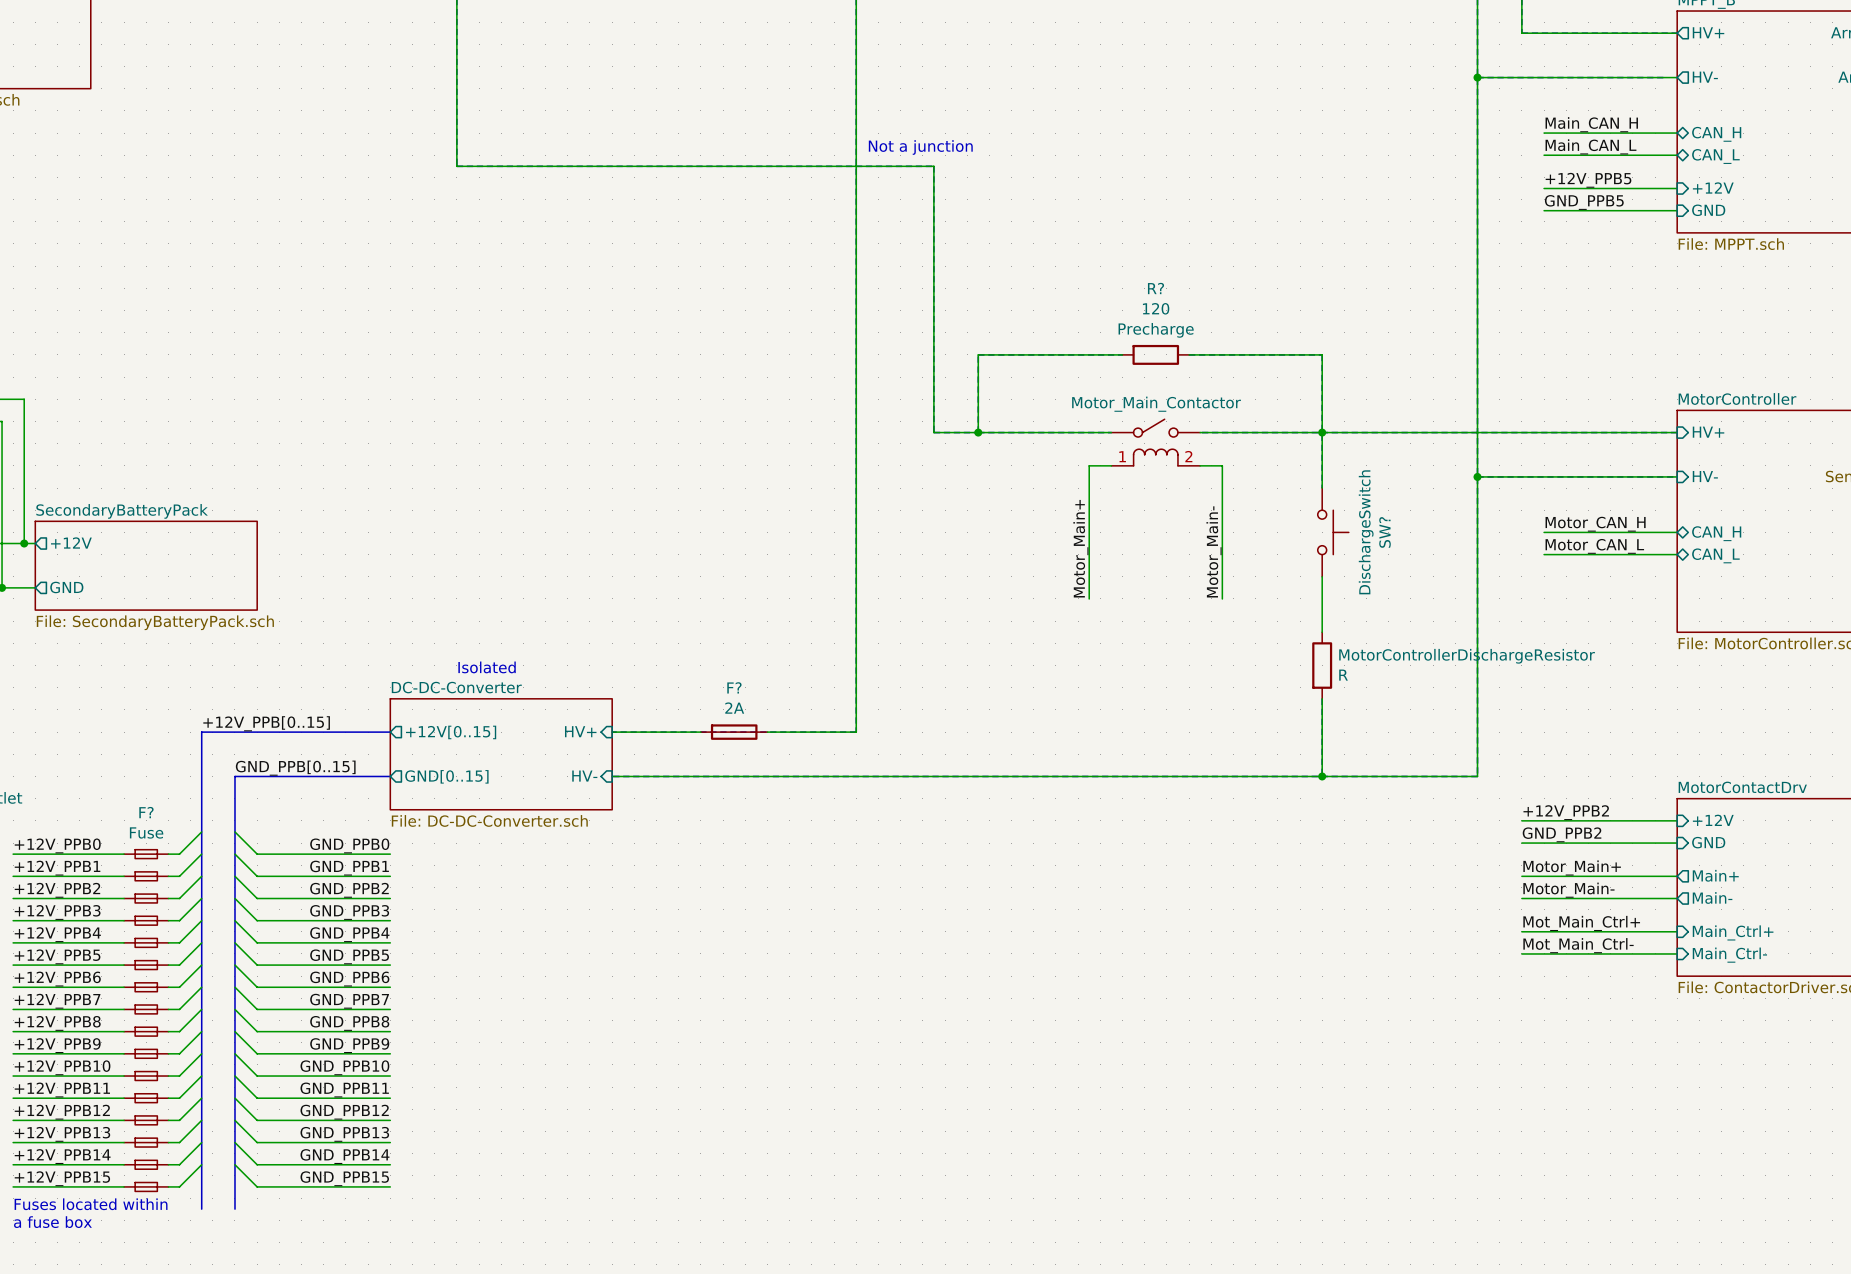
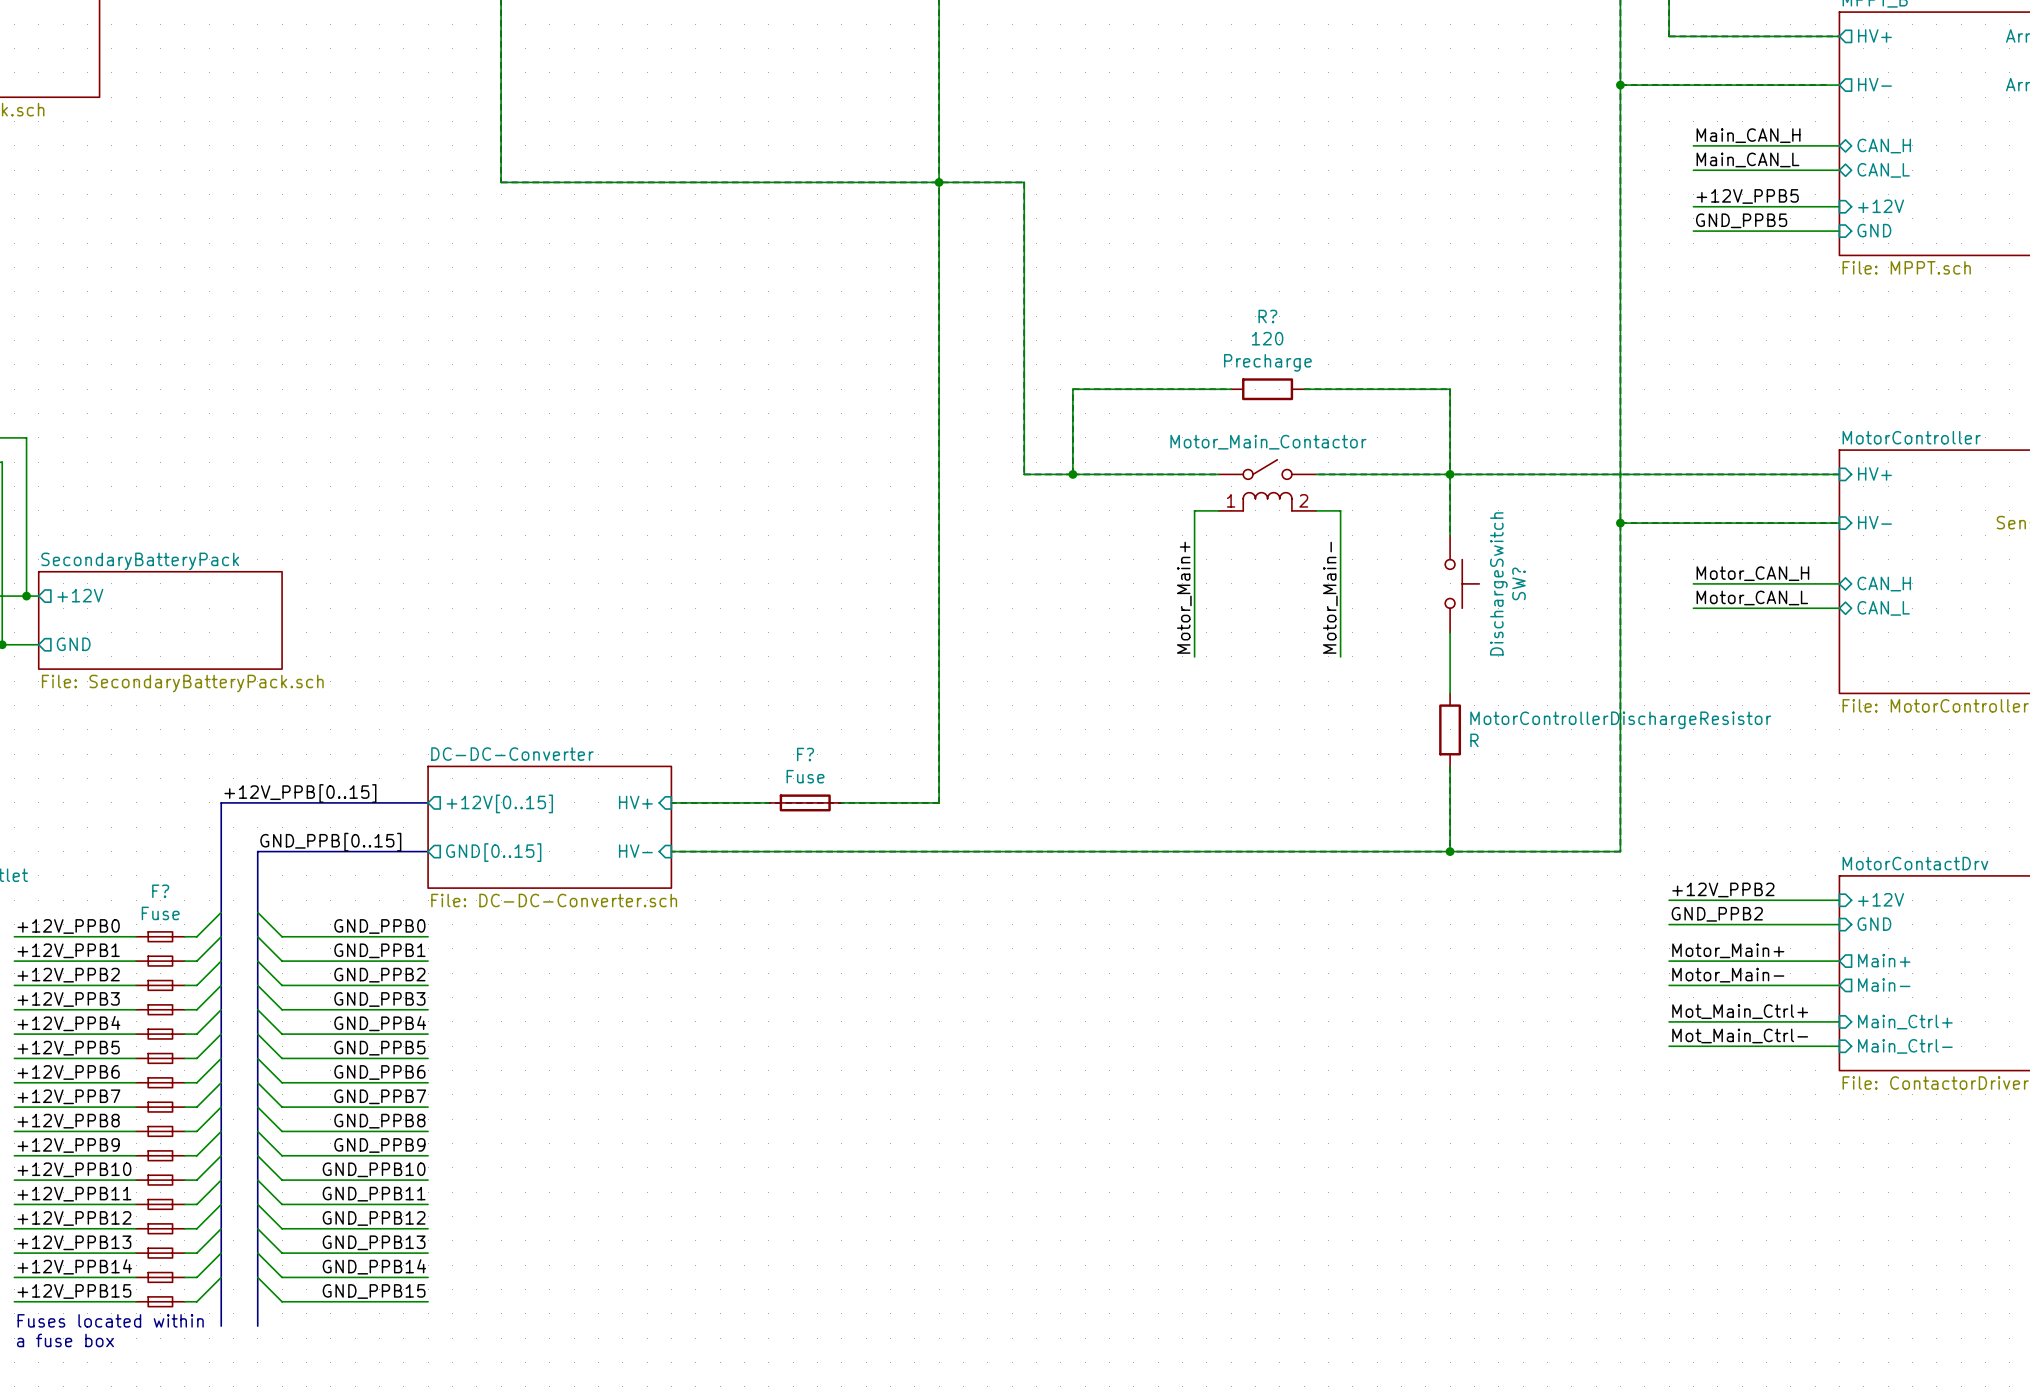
text: Not a junction (920, 147) -> none
junction: none -> (939, 182)
text: Isolated (487, 667) -> none
F? value: 2A (734, 708) -> Fuse (805, 776)

